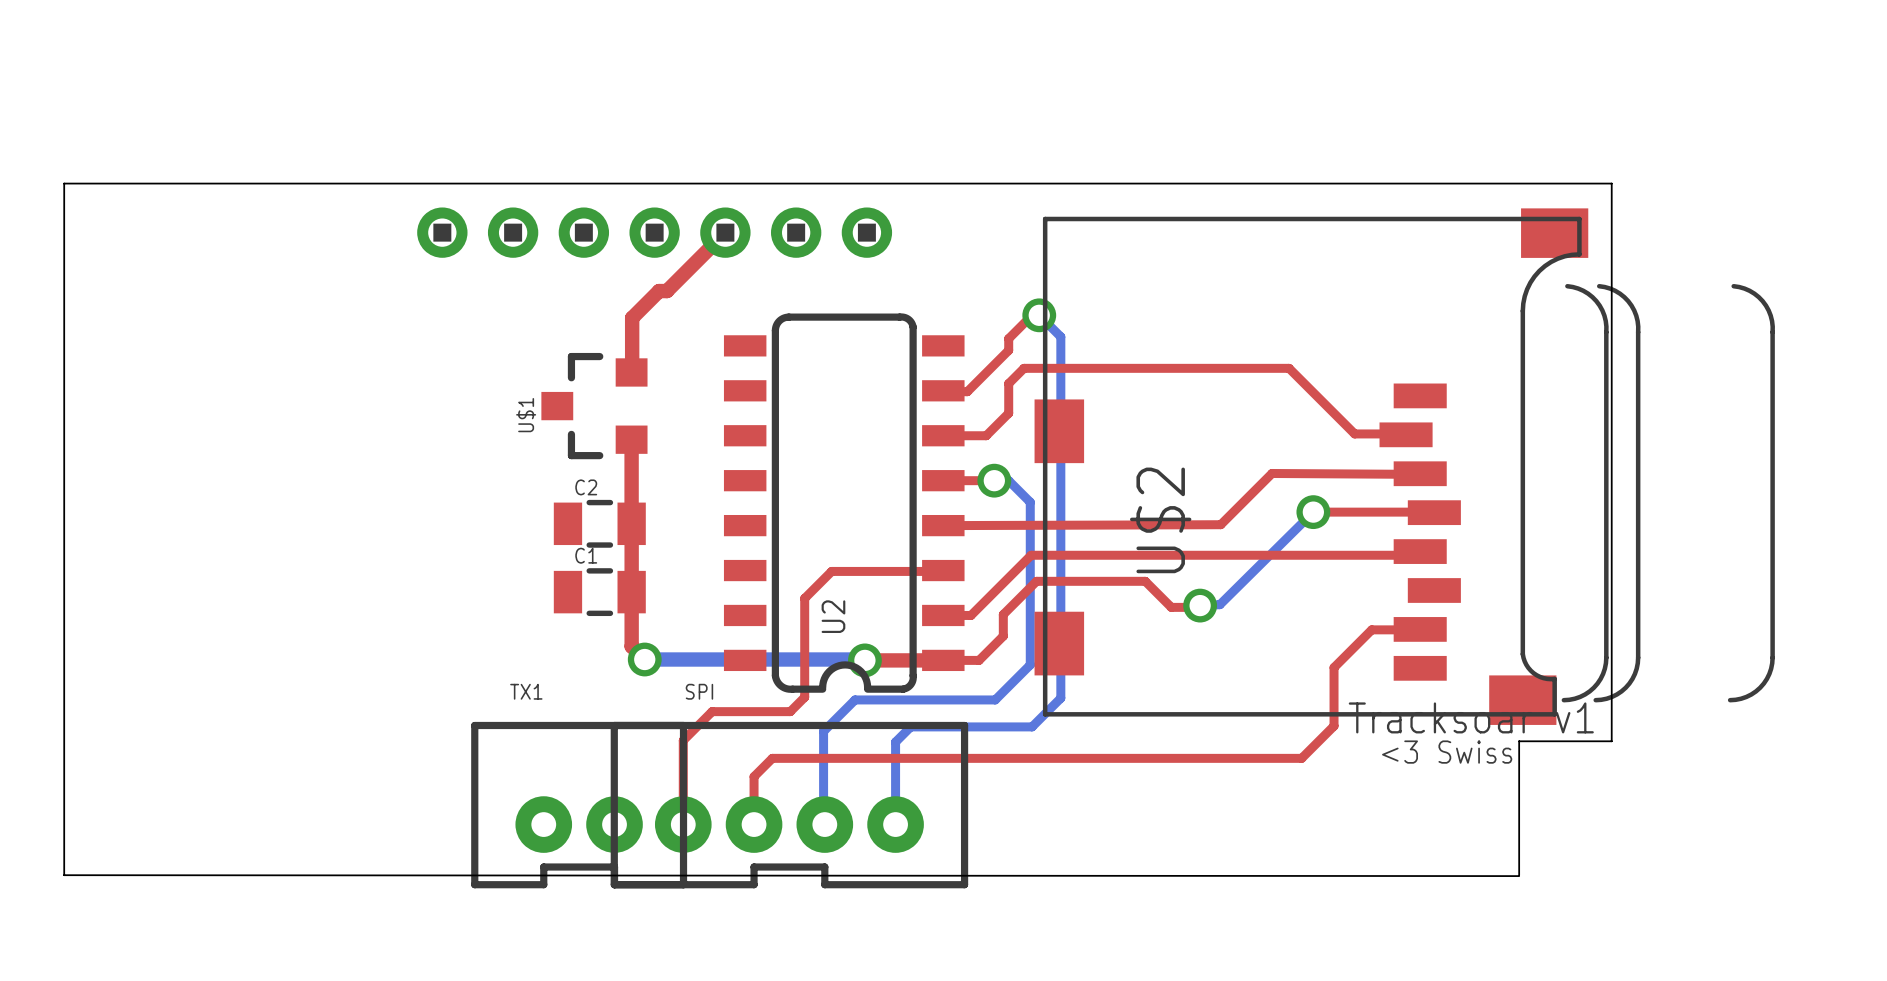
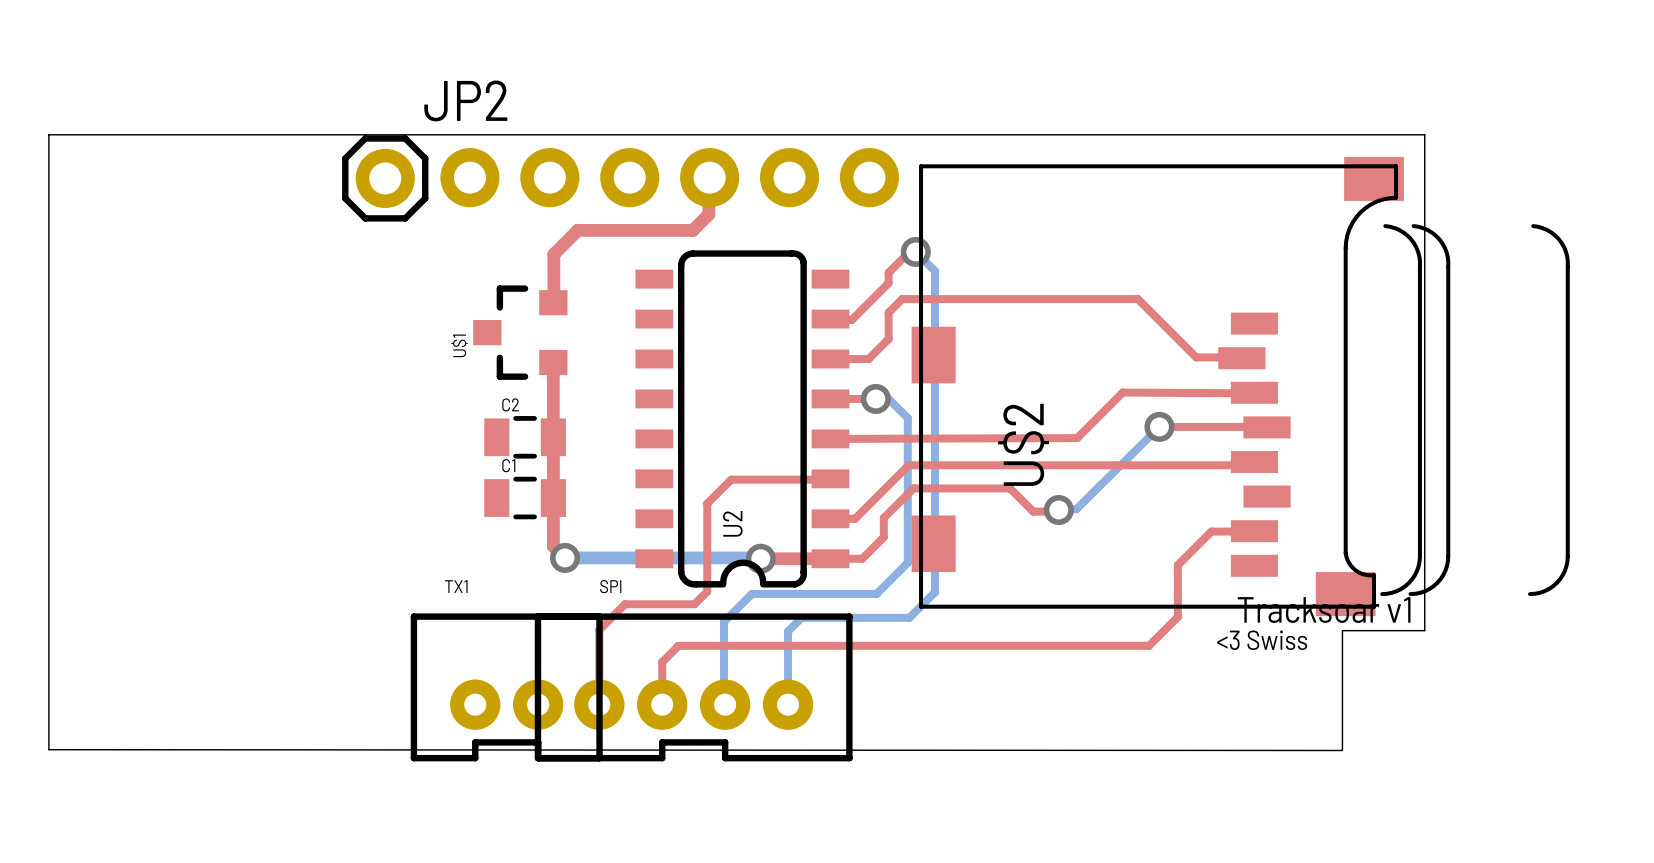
part: none -> (669, 177)
JP2: none -> (385, 178)
part: (654, 232) -> none
top track: (725, 232) (666, 291) -> (709, 177) (708, 214) (692, 230) (584, 230)

